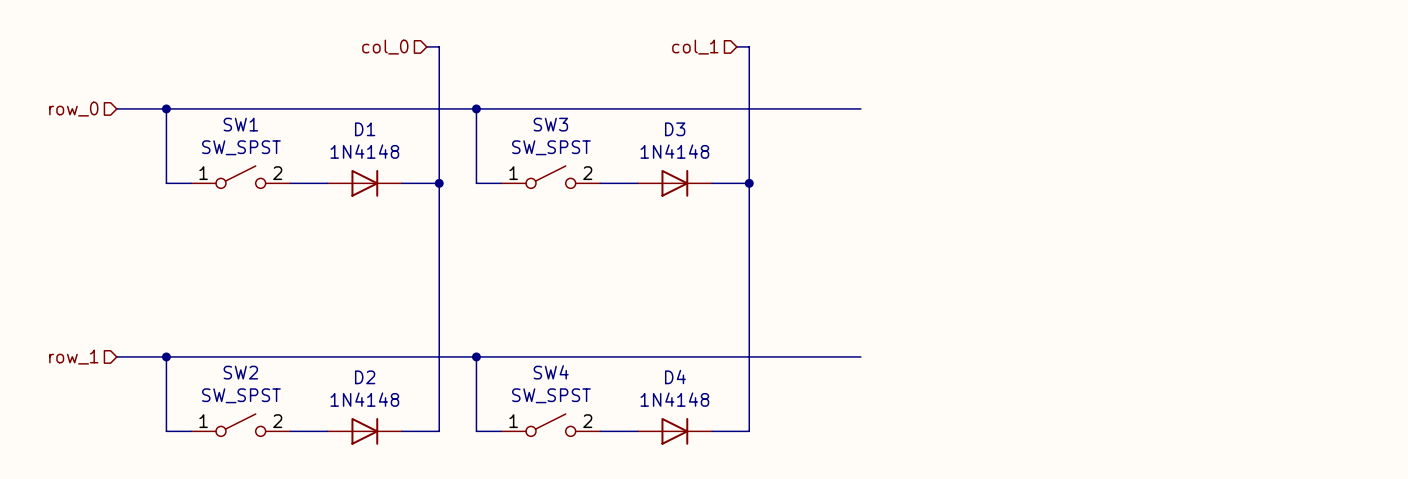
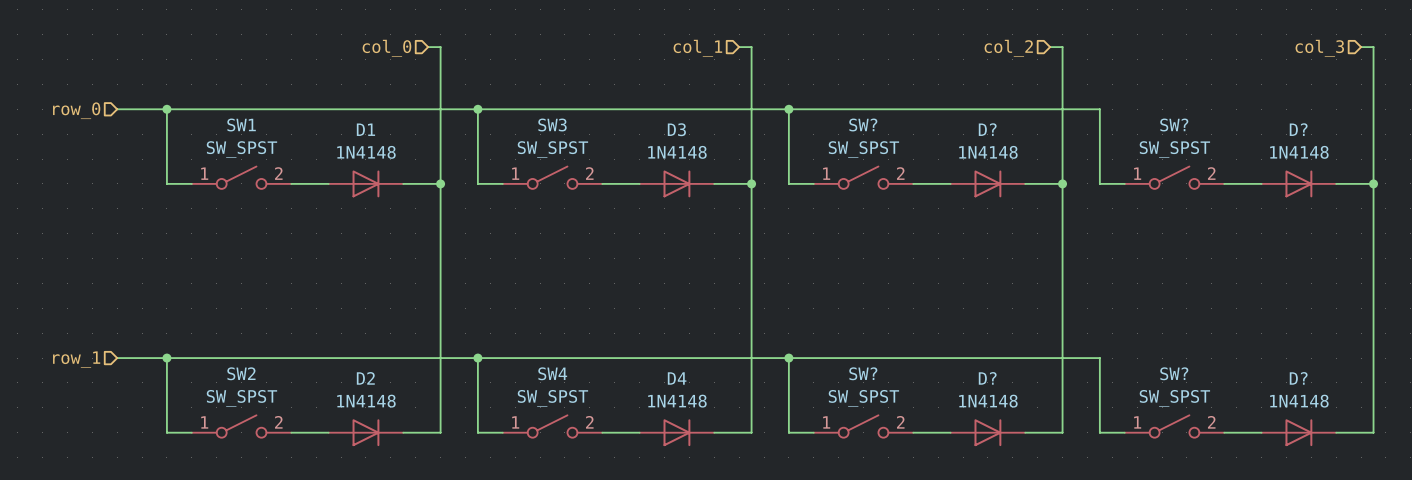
wire: none -> (1050, 47) (1062, 47) (1062, 432) (1025, 432)
wire: none -> (1361, 47) (1373, 47) (1373, 432) (1336, 432)
hierarchical label: none -> col_2 (1008, 48)
hierarchical label: none -> col_3 (1319, 48)
wire: none -> (788, 109) (788, 183) (813, 183)
junction: none -> (788, 109)
wire: none -> (863, 109) (1099, 109) (1099, 183) (1124, 183)
SW?: none -> SW_SPST (863, 177)
SW?: none -> SW_SPST (1174, 177)
wire: none -> (913, 183) (950, 183)
D?: none -> 1N4148 (987, 183)
wire: none -> (1025, 183) (1062, 183)
junction: none -> (1062, 183)
wire: none -> (1224, 183) (1261, 183)
D?: none -> 1N4148 (1298, 183)
wire: none -> (1336, 183) (1373, 183)
junction: none -> (1373, 183)
wire: none -> (788, 358) (788, 432) (813, 432)
junction: none -> (788, 358)
wire: none -> (863, 358) (1099, 358) (1099, 432) (1124, 432)
SW?: none -> SW_SPST (863, 426)
SW?: none -> SW_SPST (1174, 426)
wire: none -> (913, 432) (950, 432)
D?: none -> 1N4148 (987, 432)
wire: none -> (1224, 432) (1261, 432)
D?: none -> 1N4148 (1298, 432)

